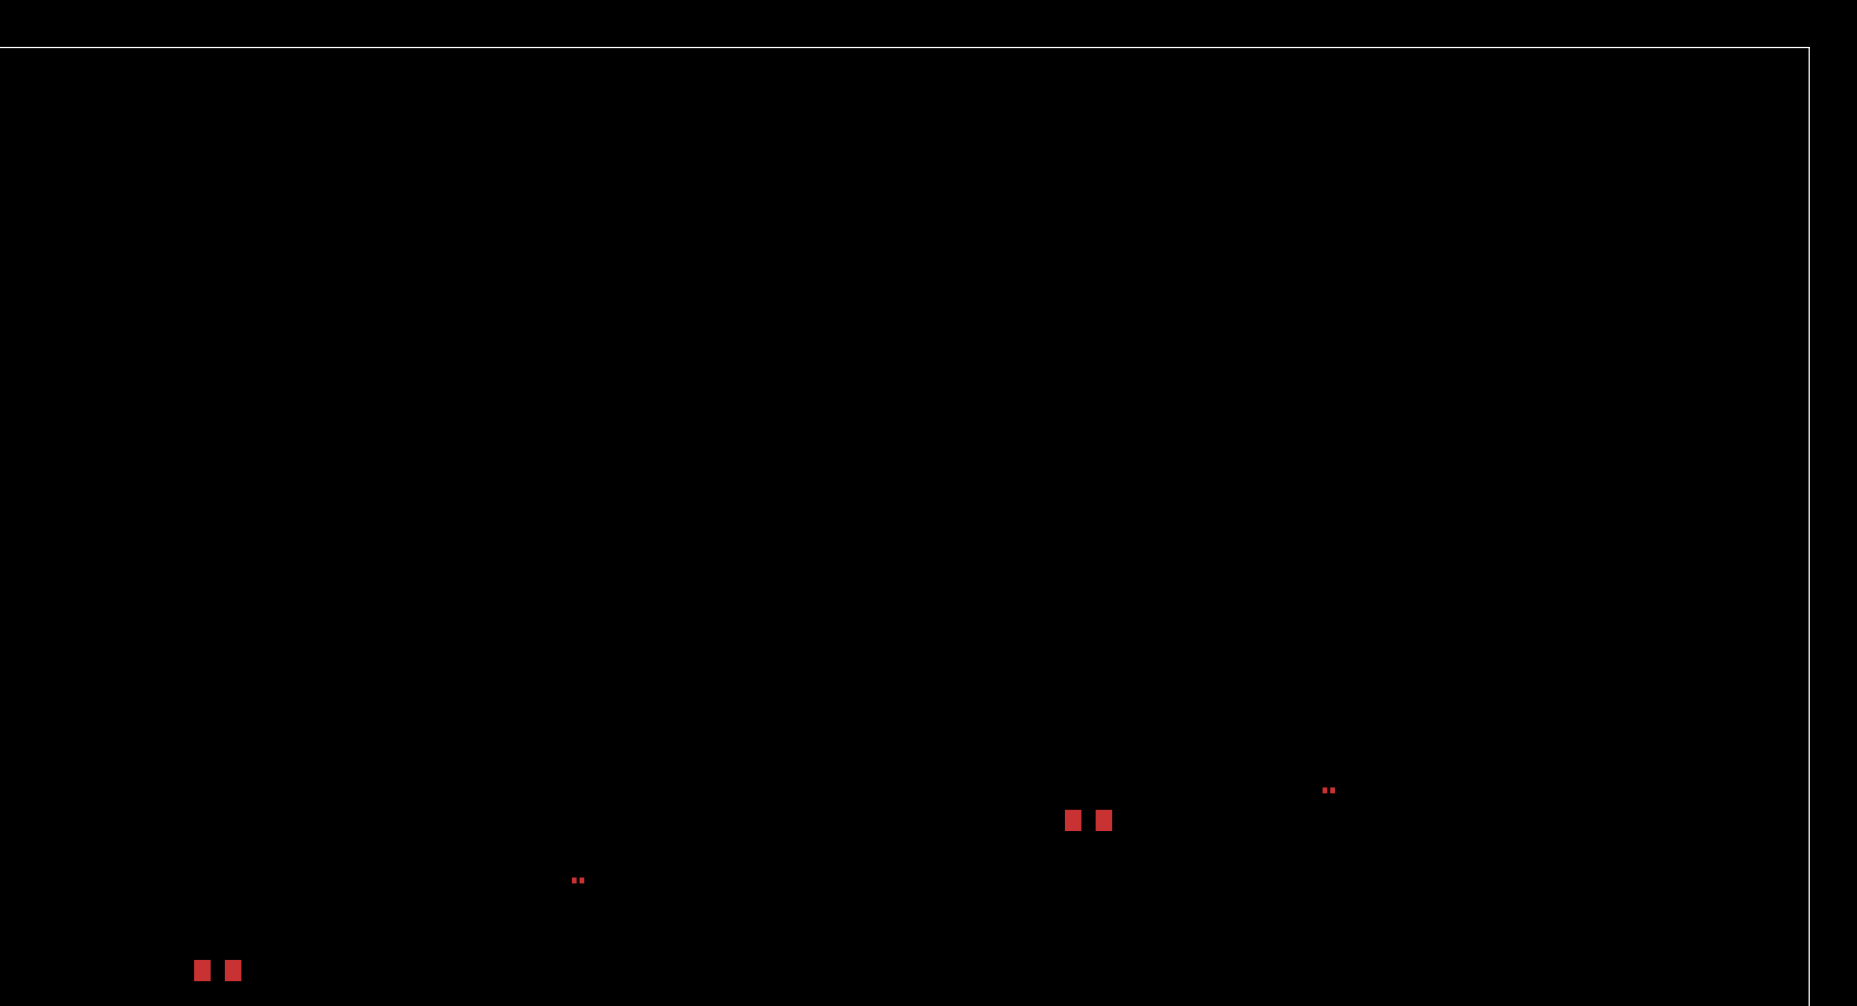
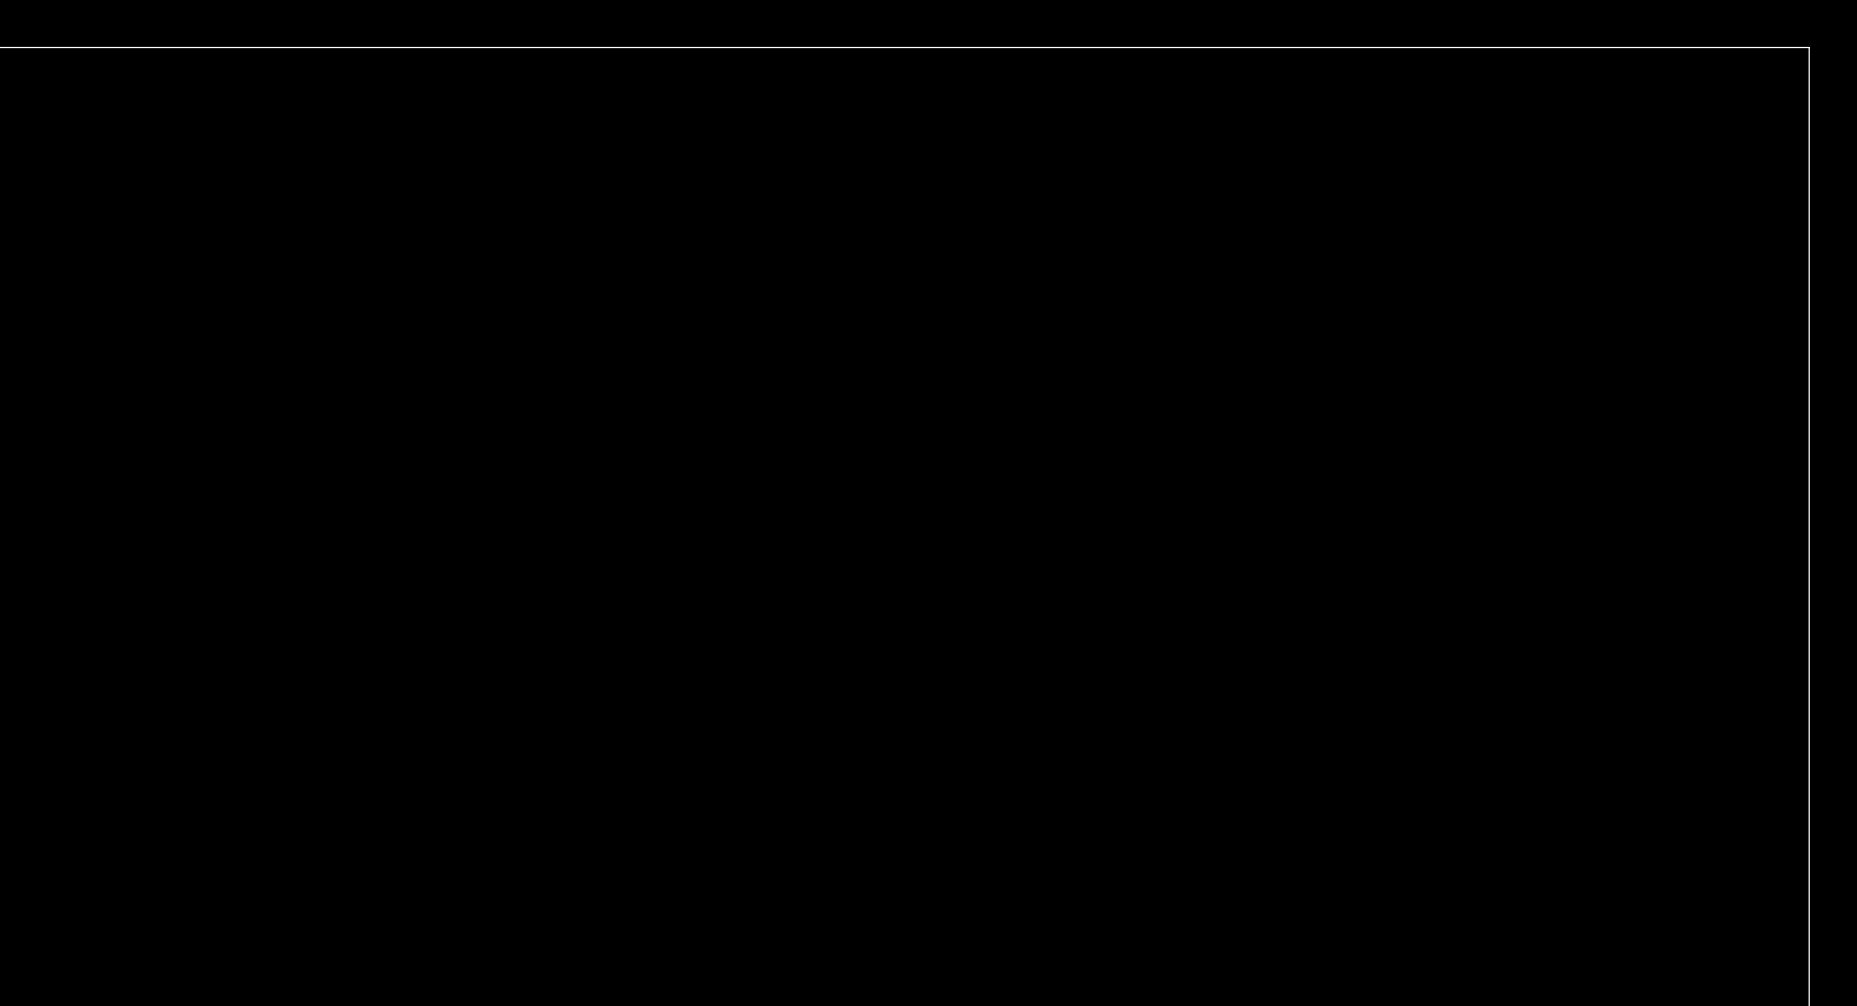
part: (1328, 790) -> none
part: (1088, 820) -> none
part: (578, 880) -> none
part: (217, 970) -> none

